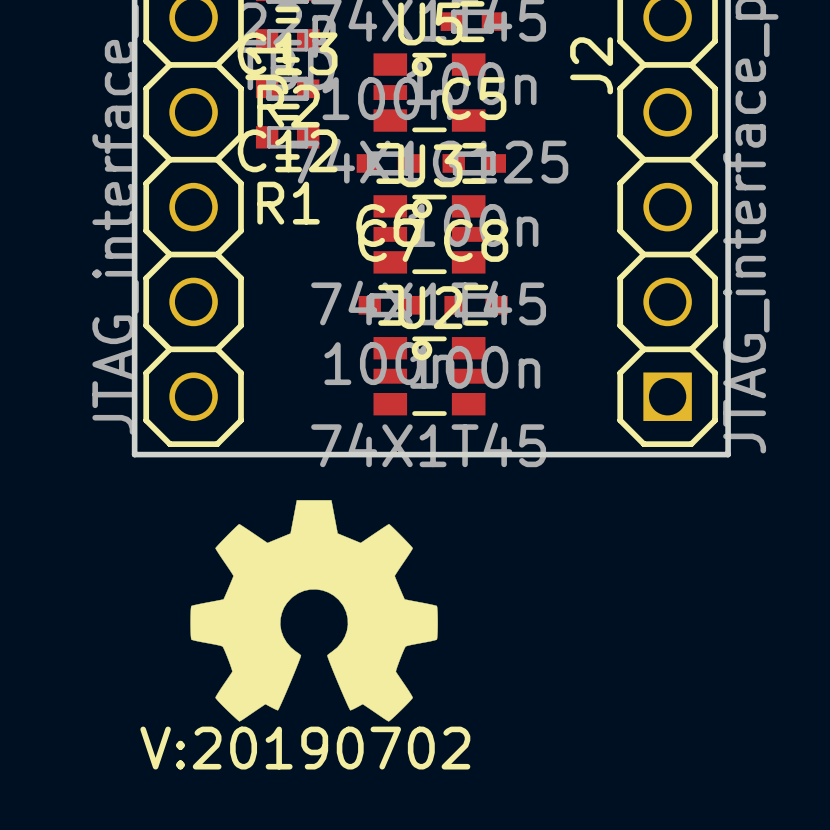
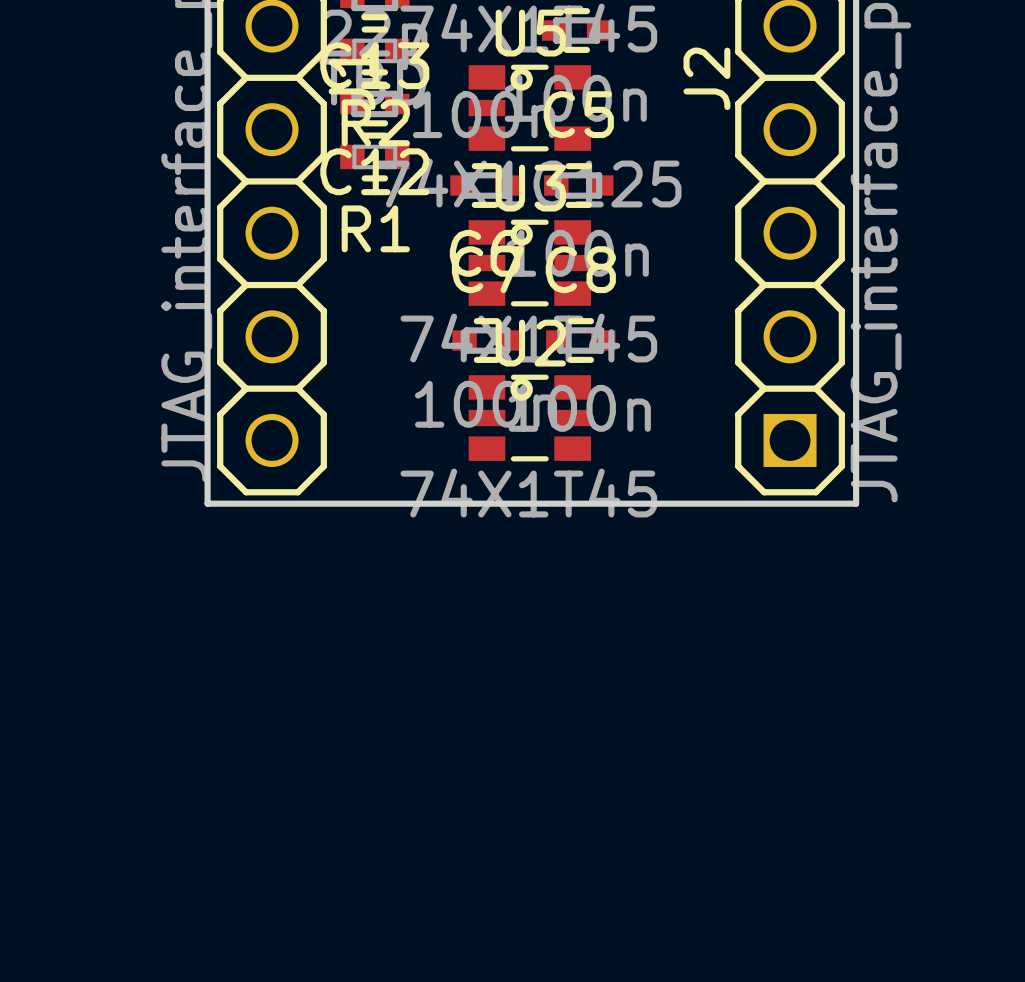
drawing: [190, 500, 438, 722] -> none

